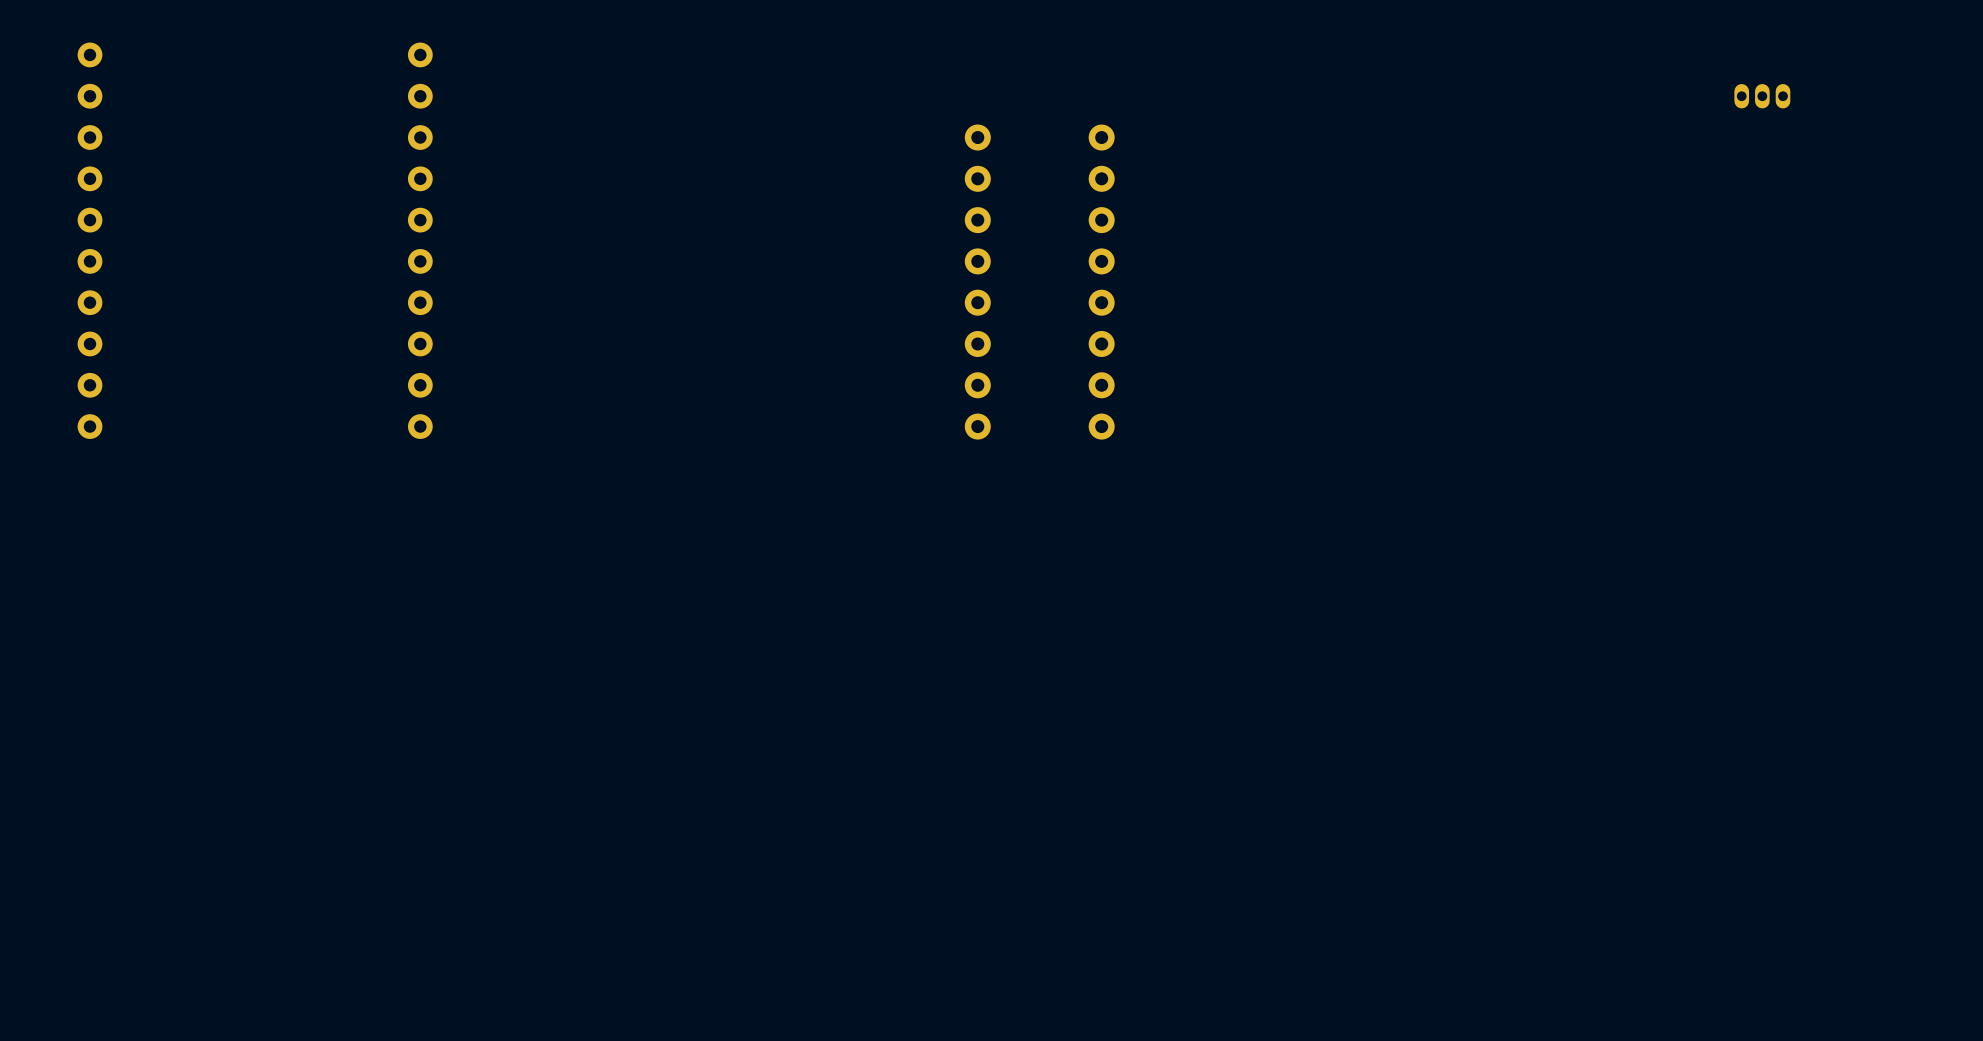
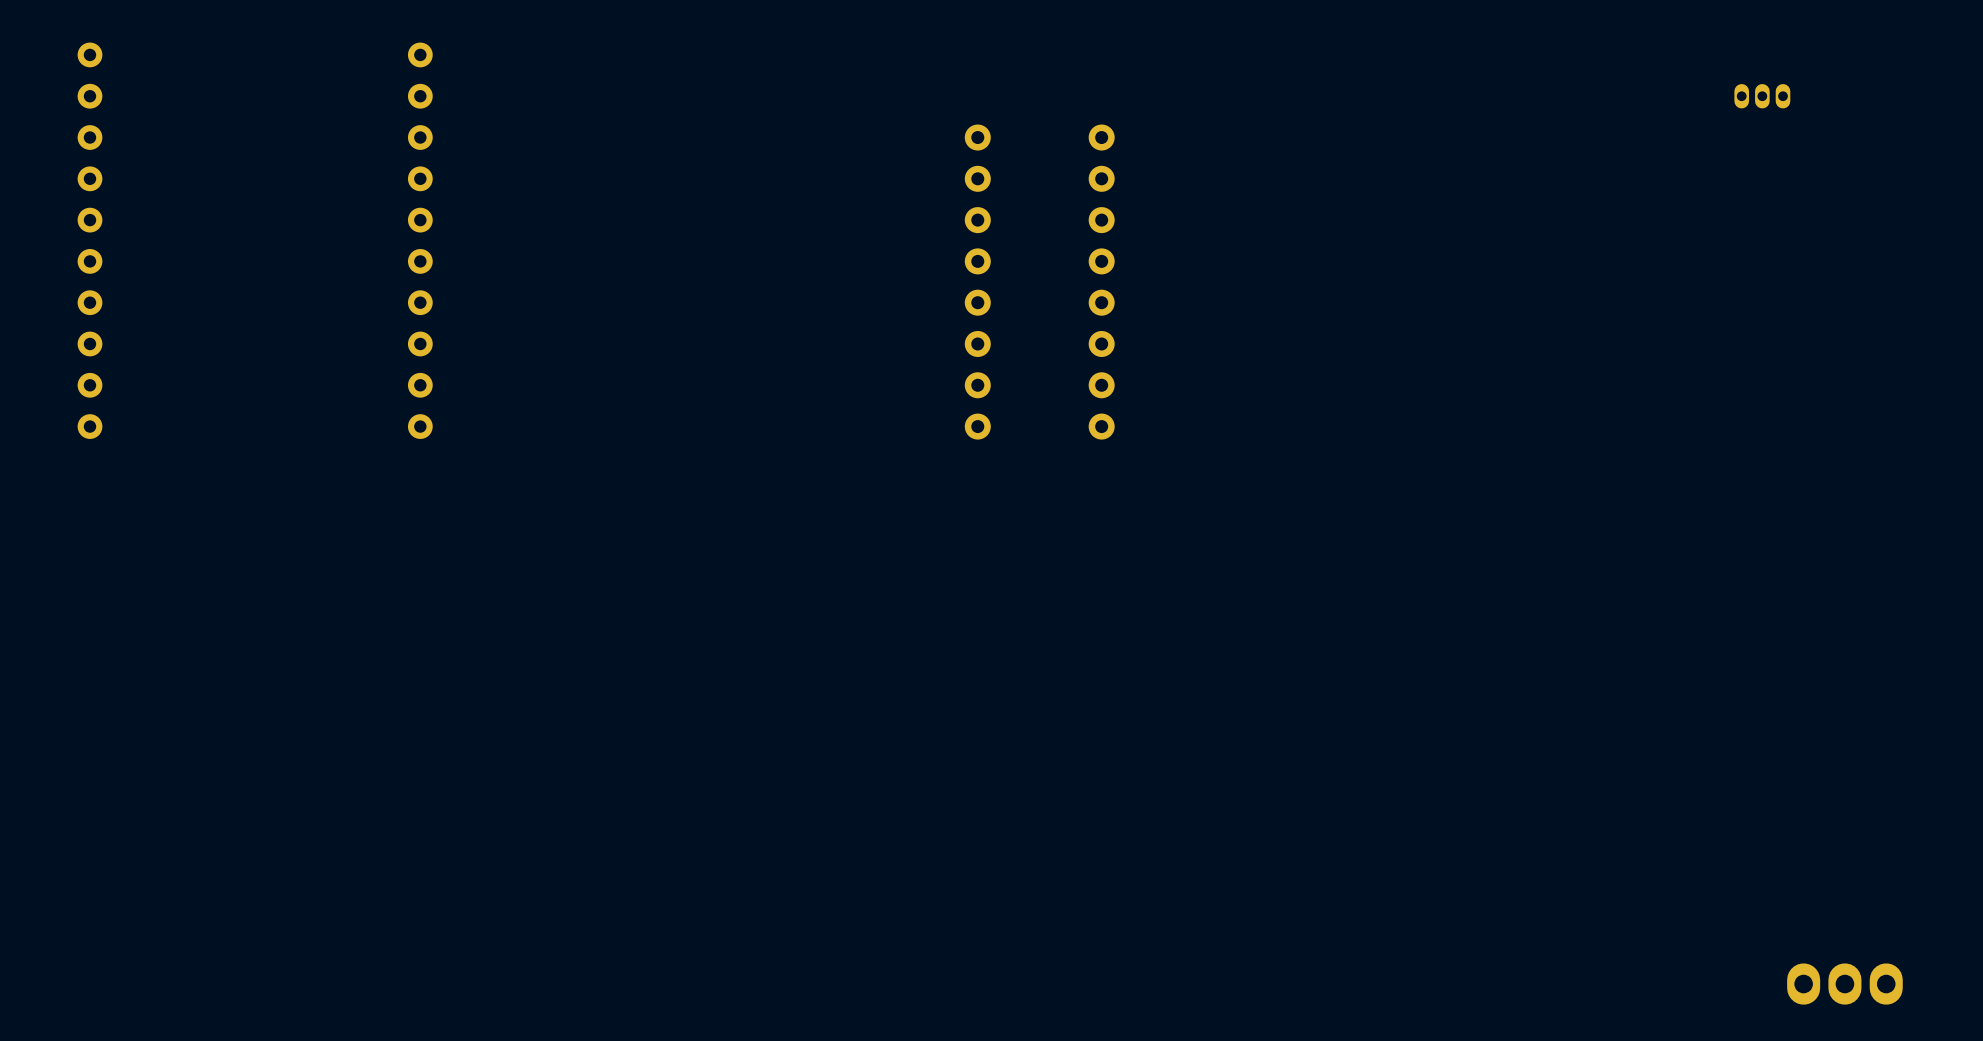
part: none -> (1844, 984)

